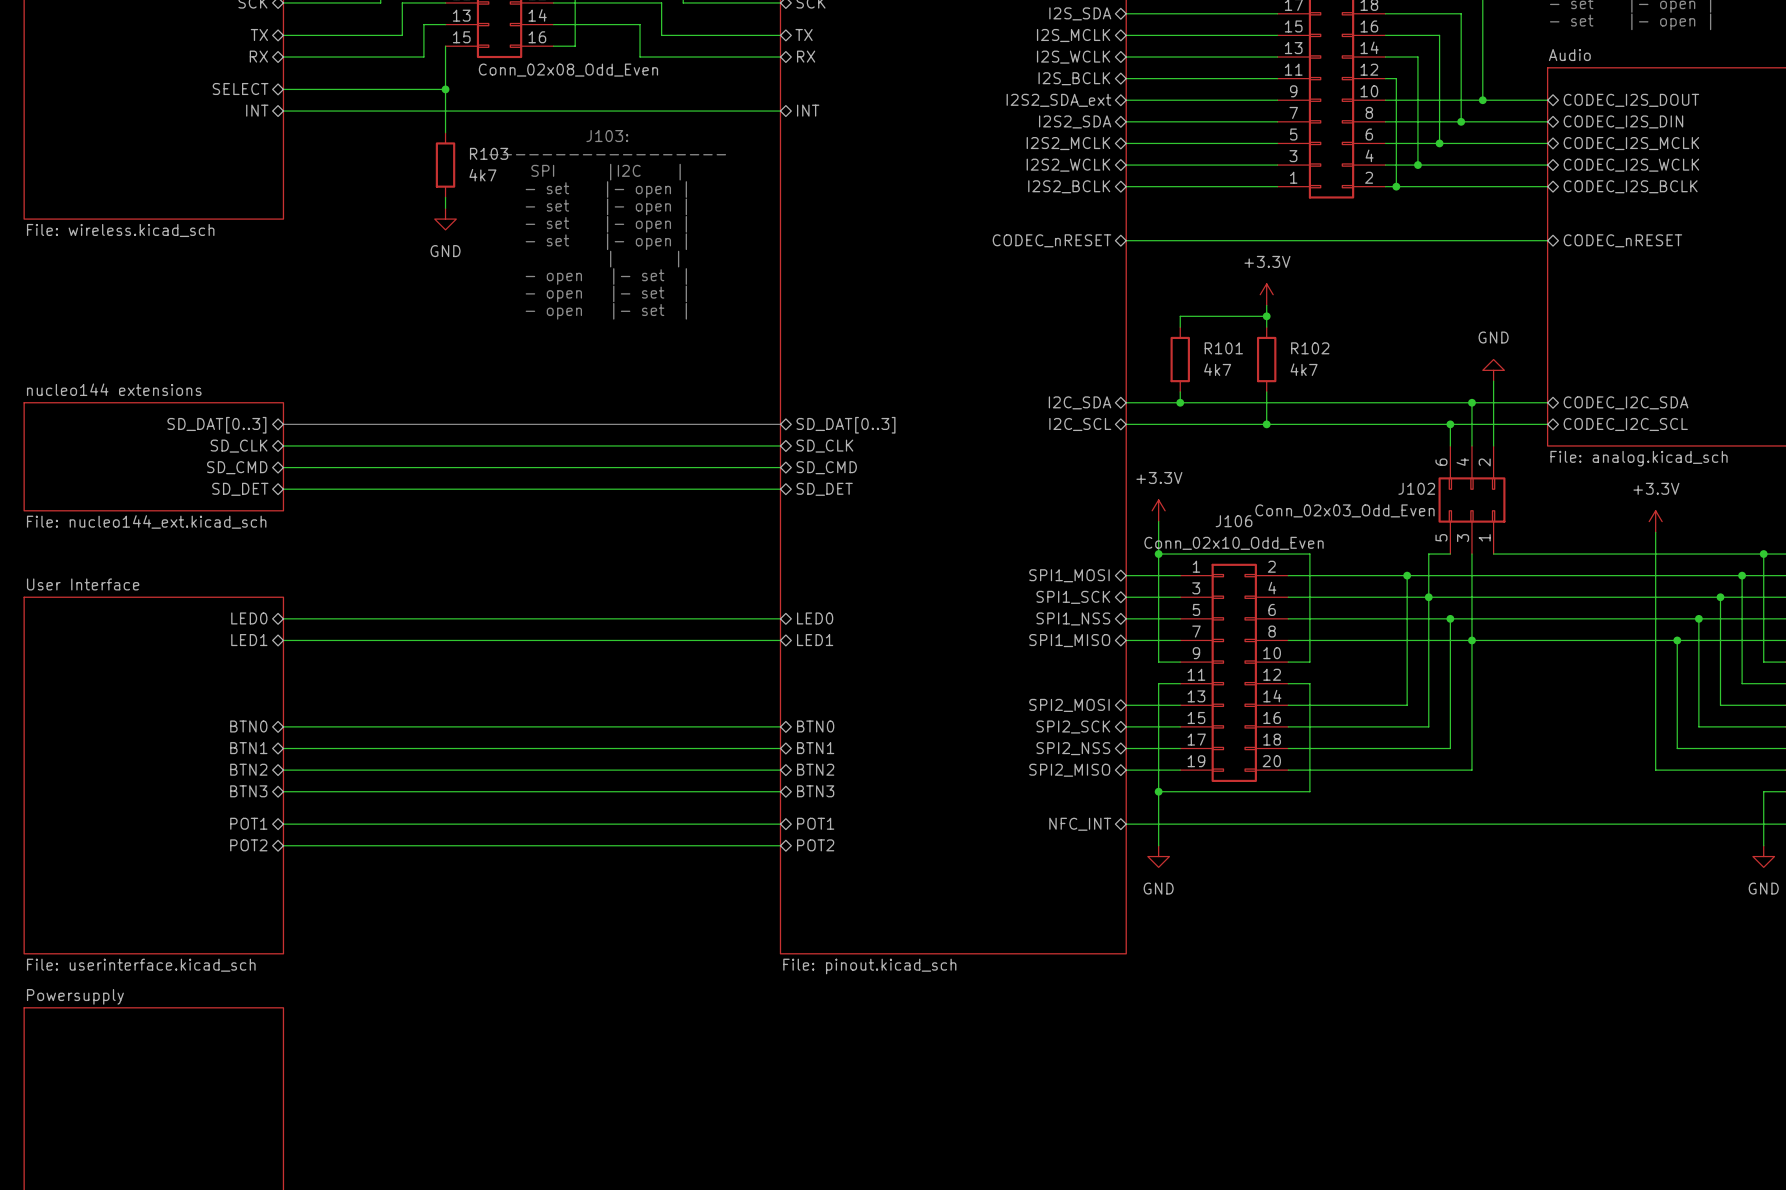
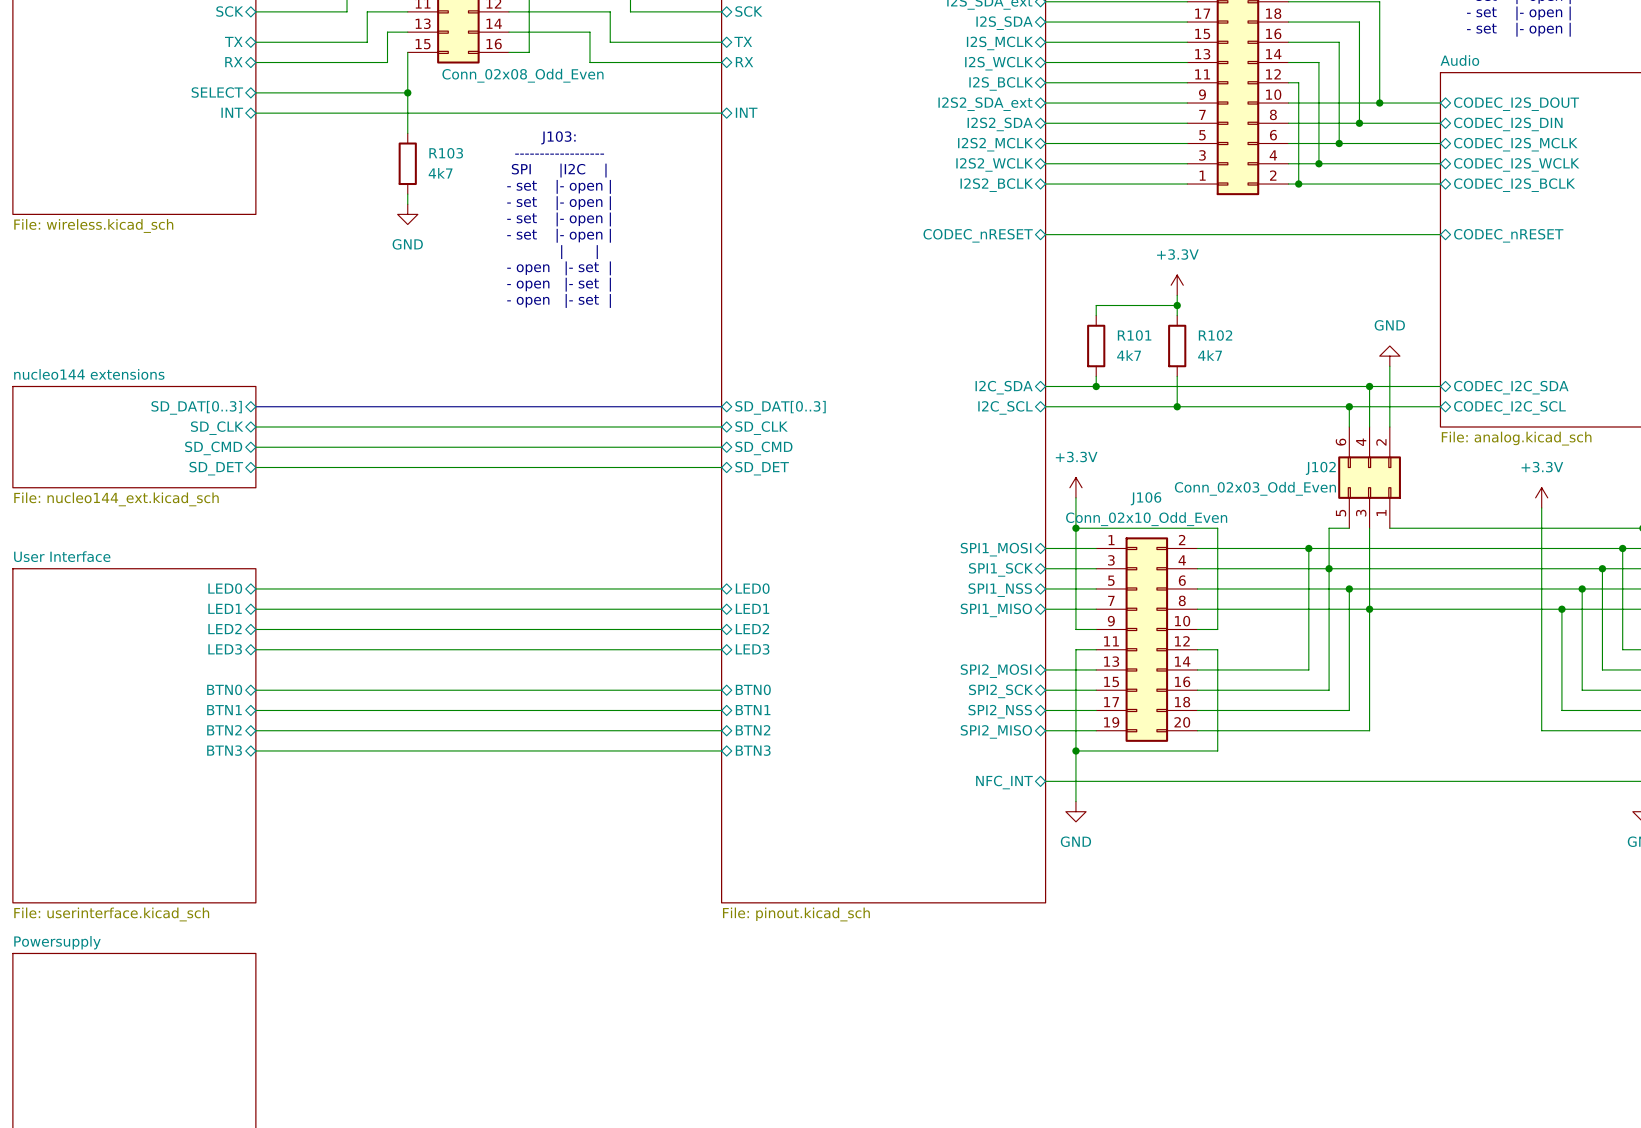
sheet pin: none -> LED2 (224, 629)
sheet pin: none -> LED2 (752, 629)
sheet pin: none -> LED3 (225, 649)
sheet pin: none -> LED3 (752, 649)
sheet pin: POT1 (248, 823) -> none
sheet pin: POT1 (815, 823) -> none
wire: (283, 824) (780, 824) -> (255, 649) (721, 649)
sheet pin: POT2 (248, 845) -> none
wire: (283, 845) (780, 845) -> (255, 629) (721, 629)
sheet pin: POT2 (815, 845) -> none

